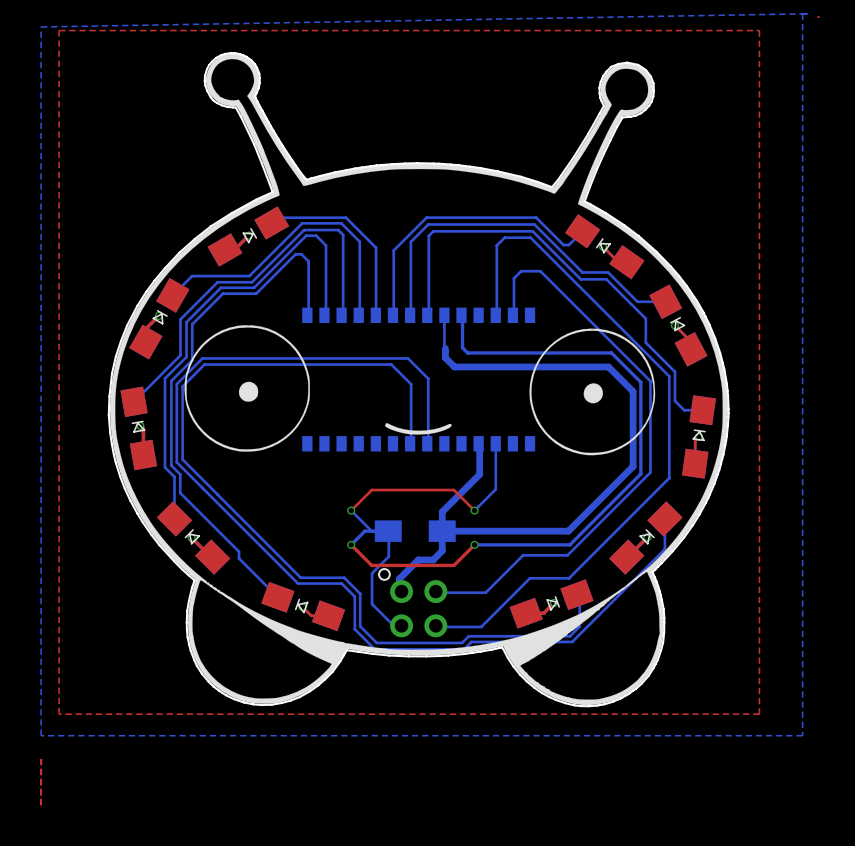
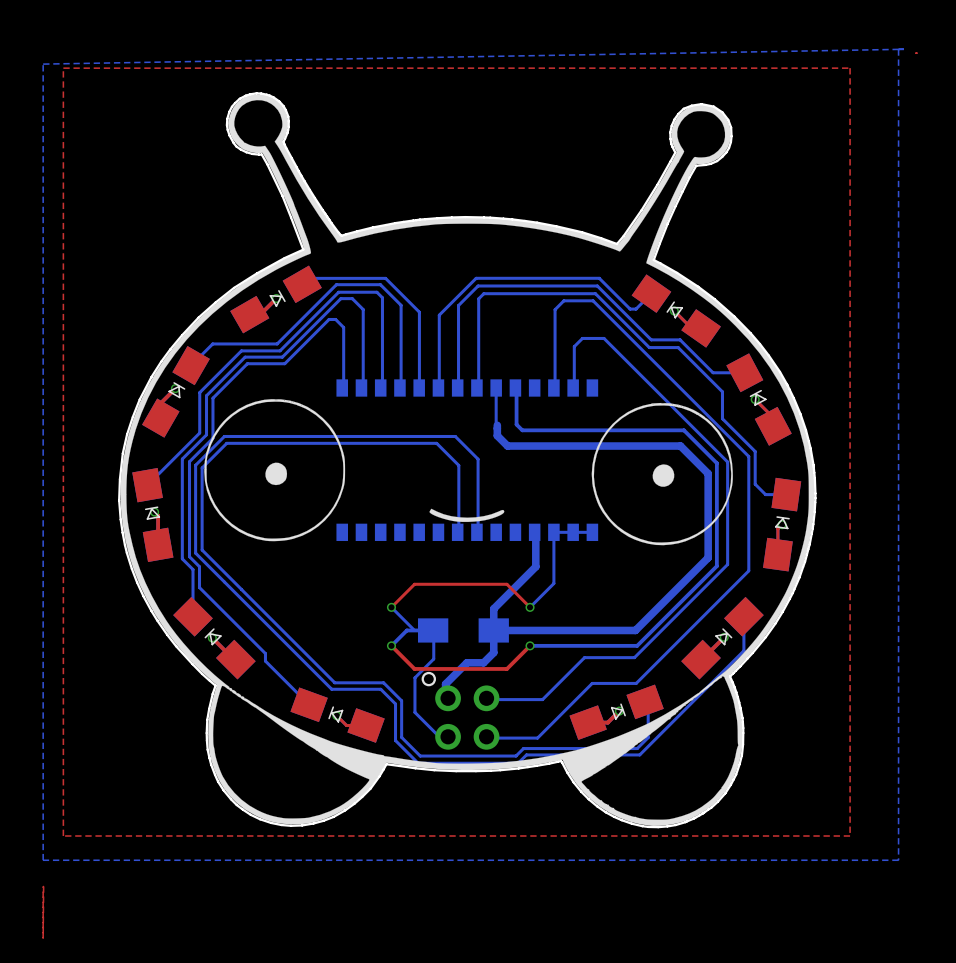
bottom track: none -> (553, 532) (592, 532)

